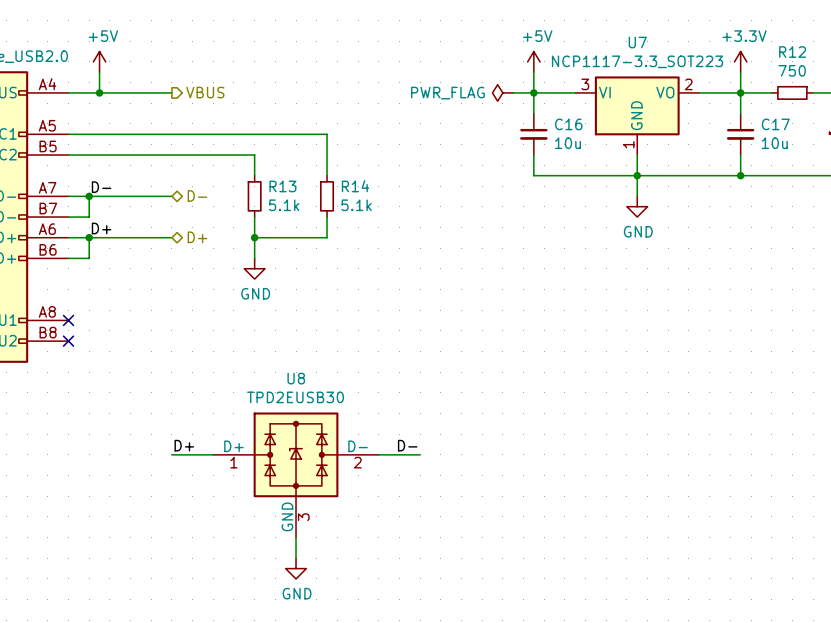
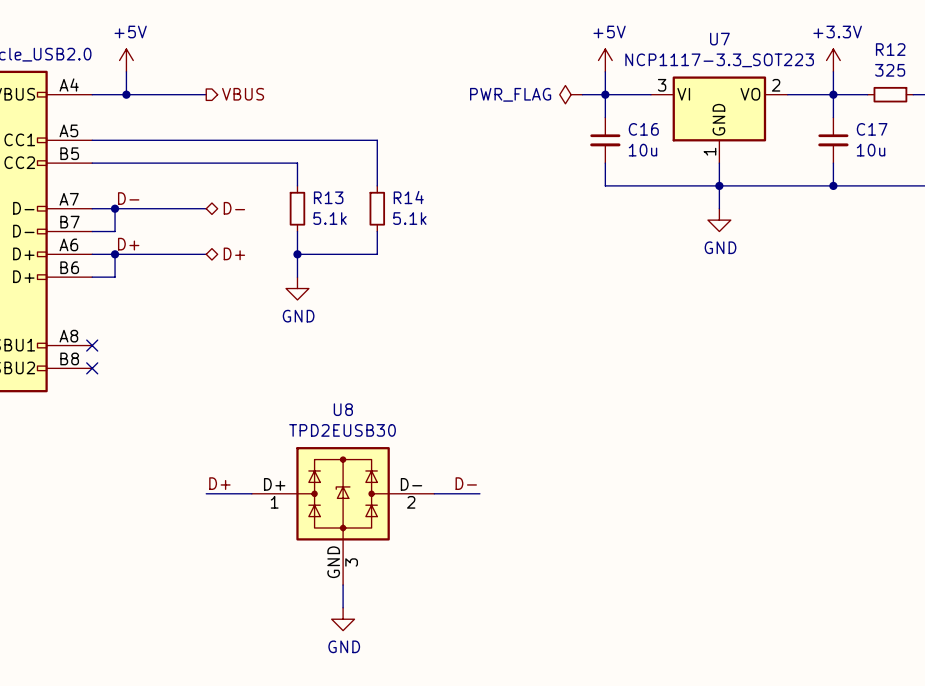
R12 value: 750 (792, 70) -> 325 (890, 70)

